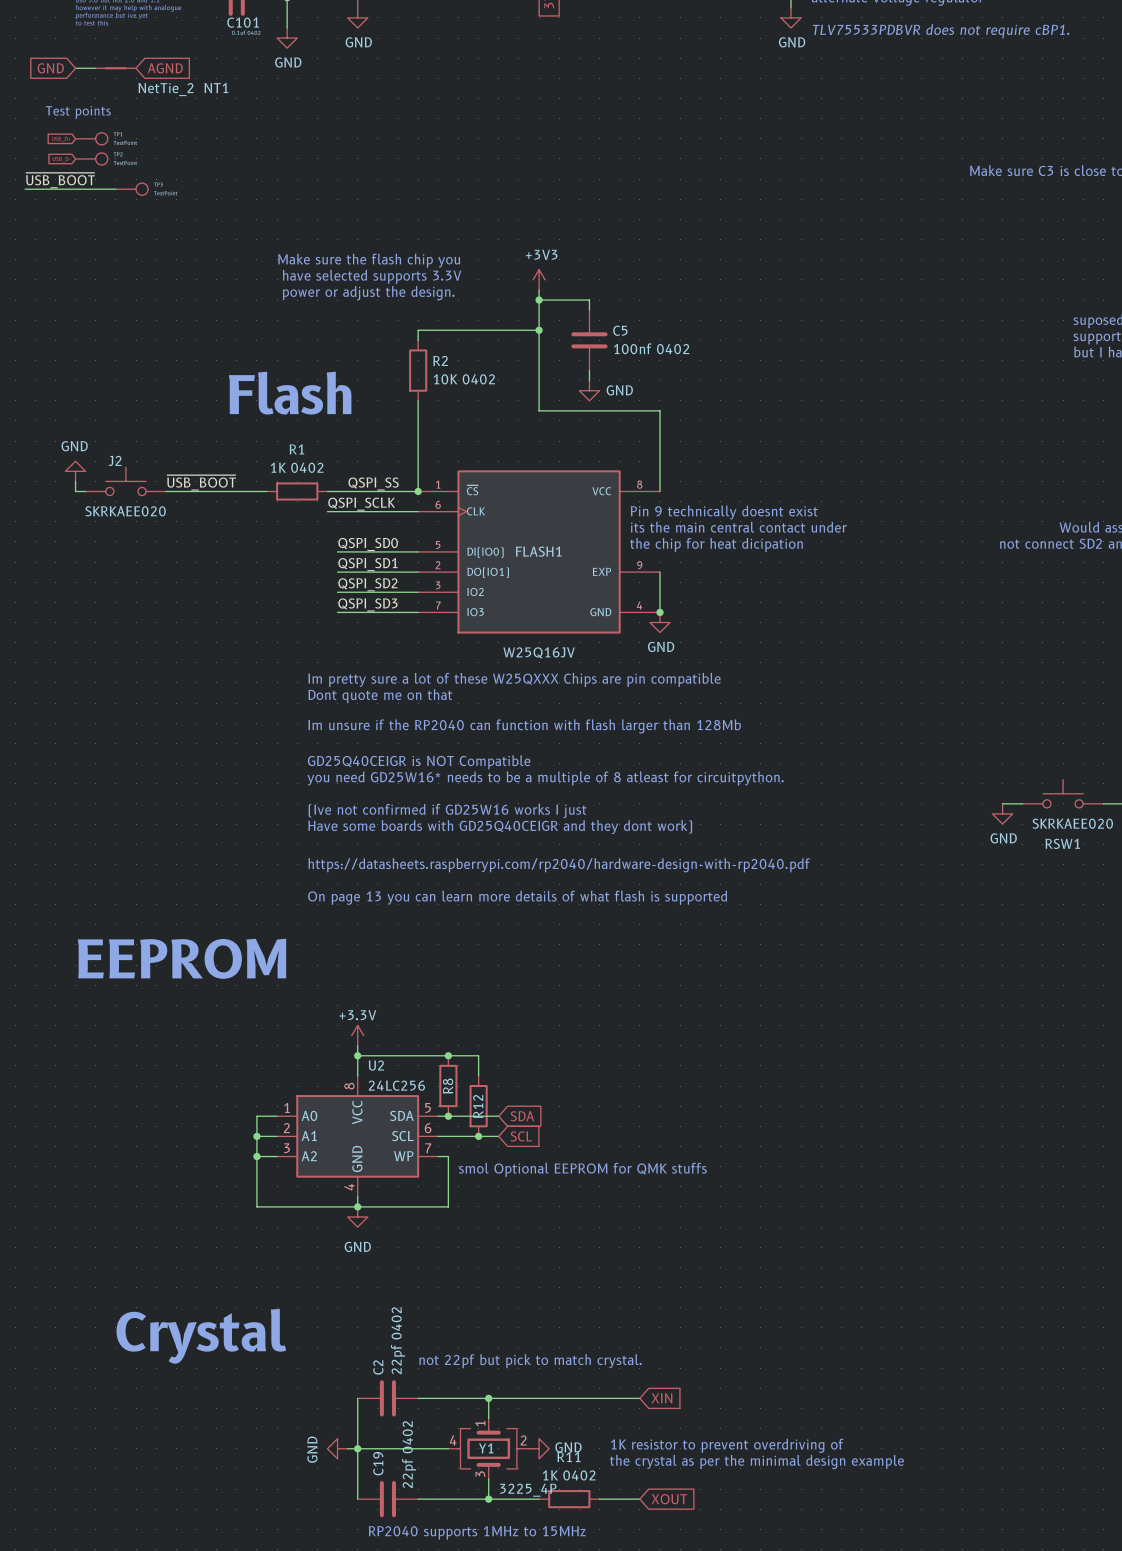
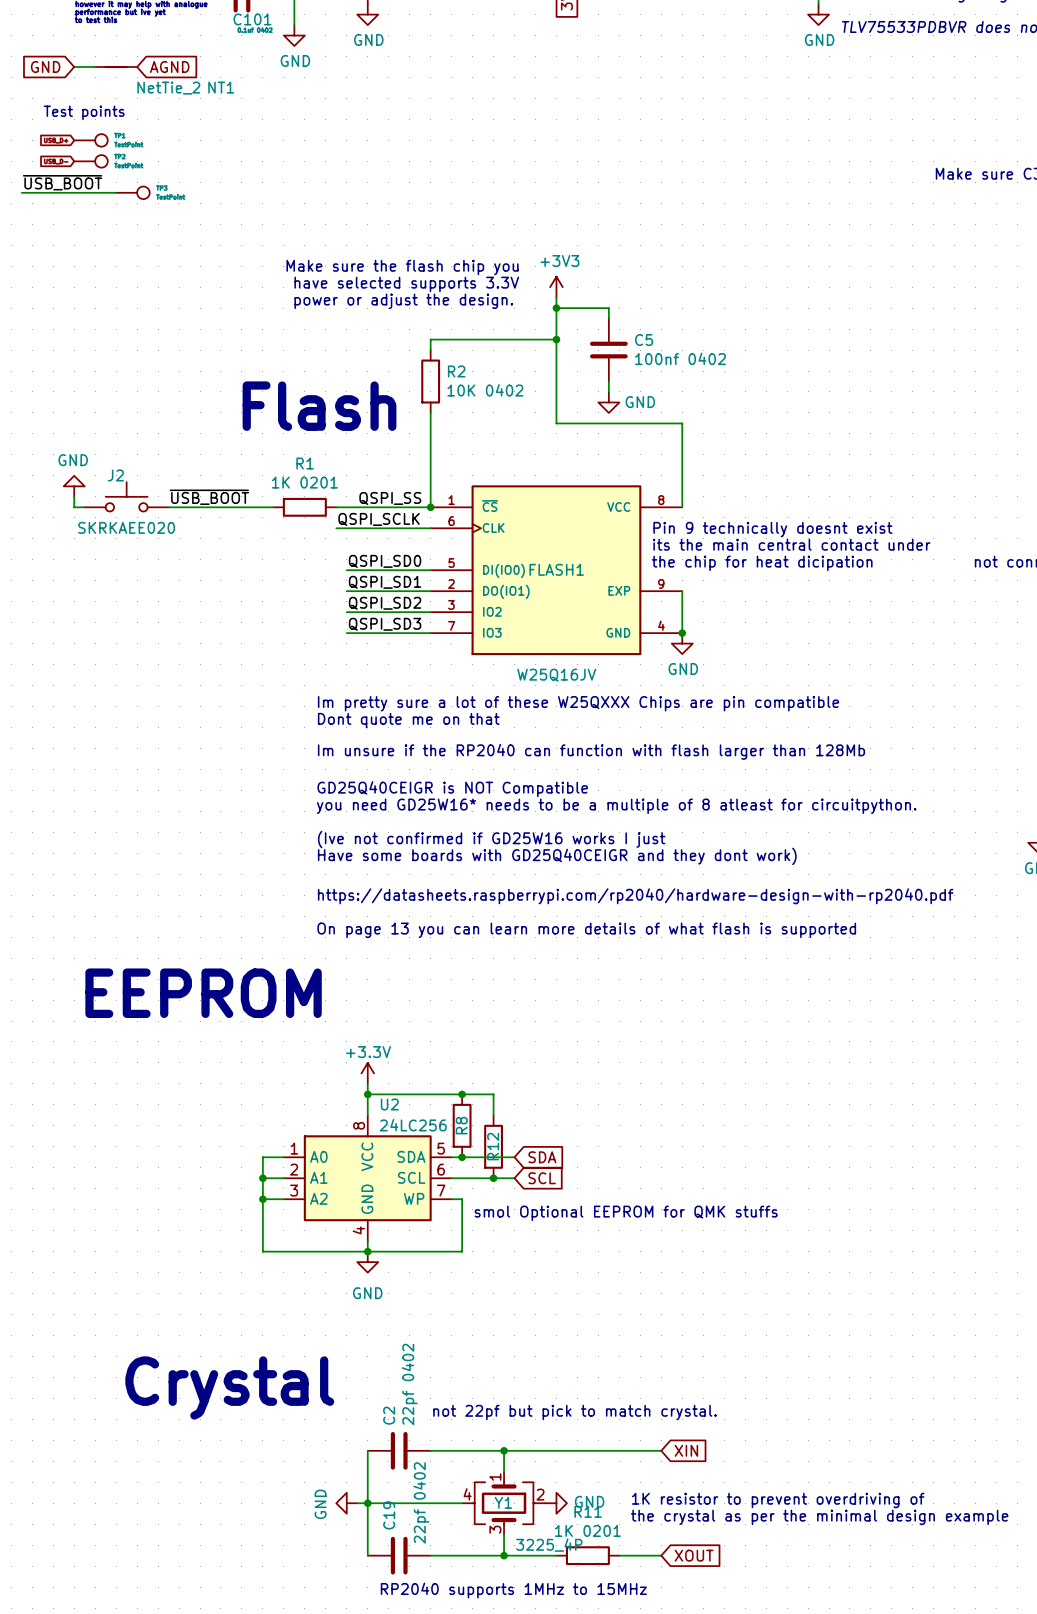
R1 value: 1K 0402 (297, 467) -> 1K 0201 (304, 482)
R11 value: 1K 0402 (569, 1475) -> 1K 0201 (587, 1530)

